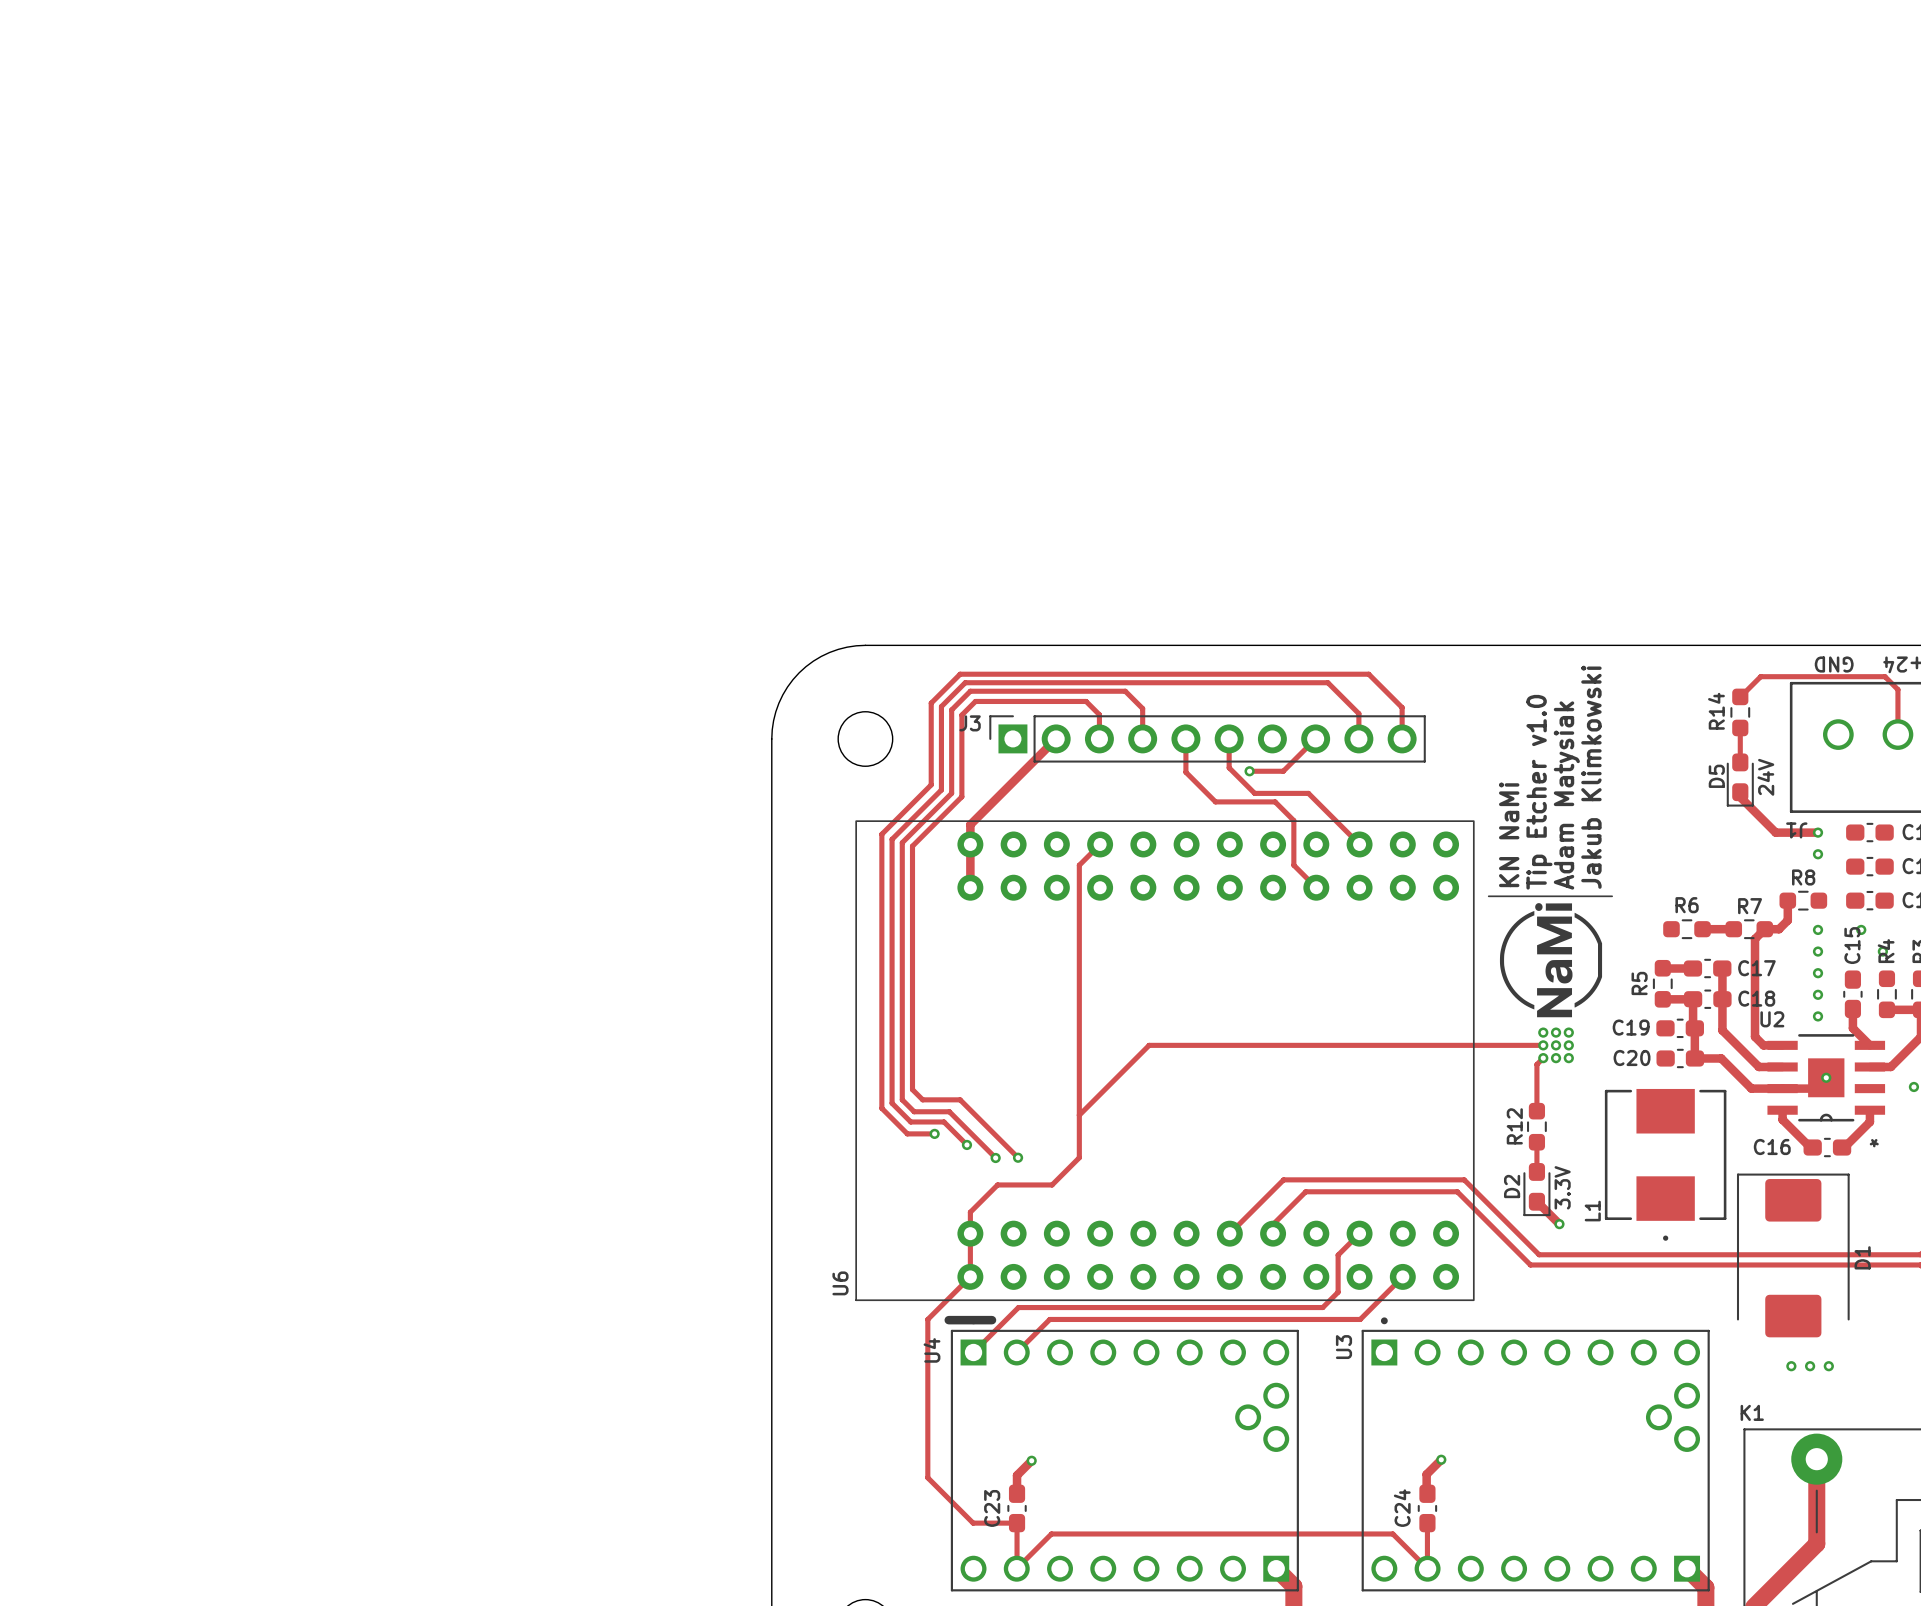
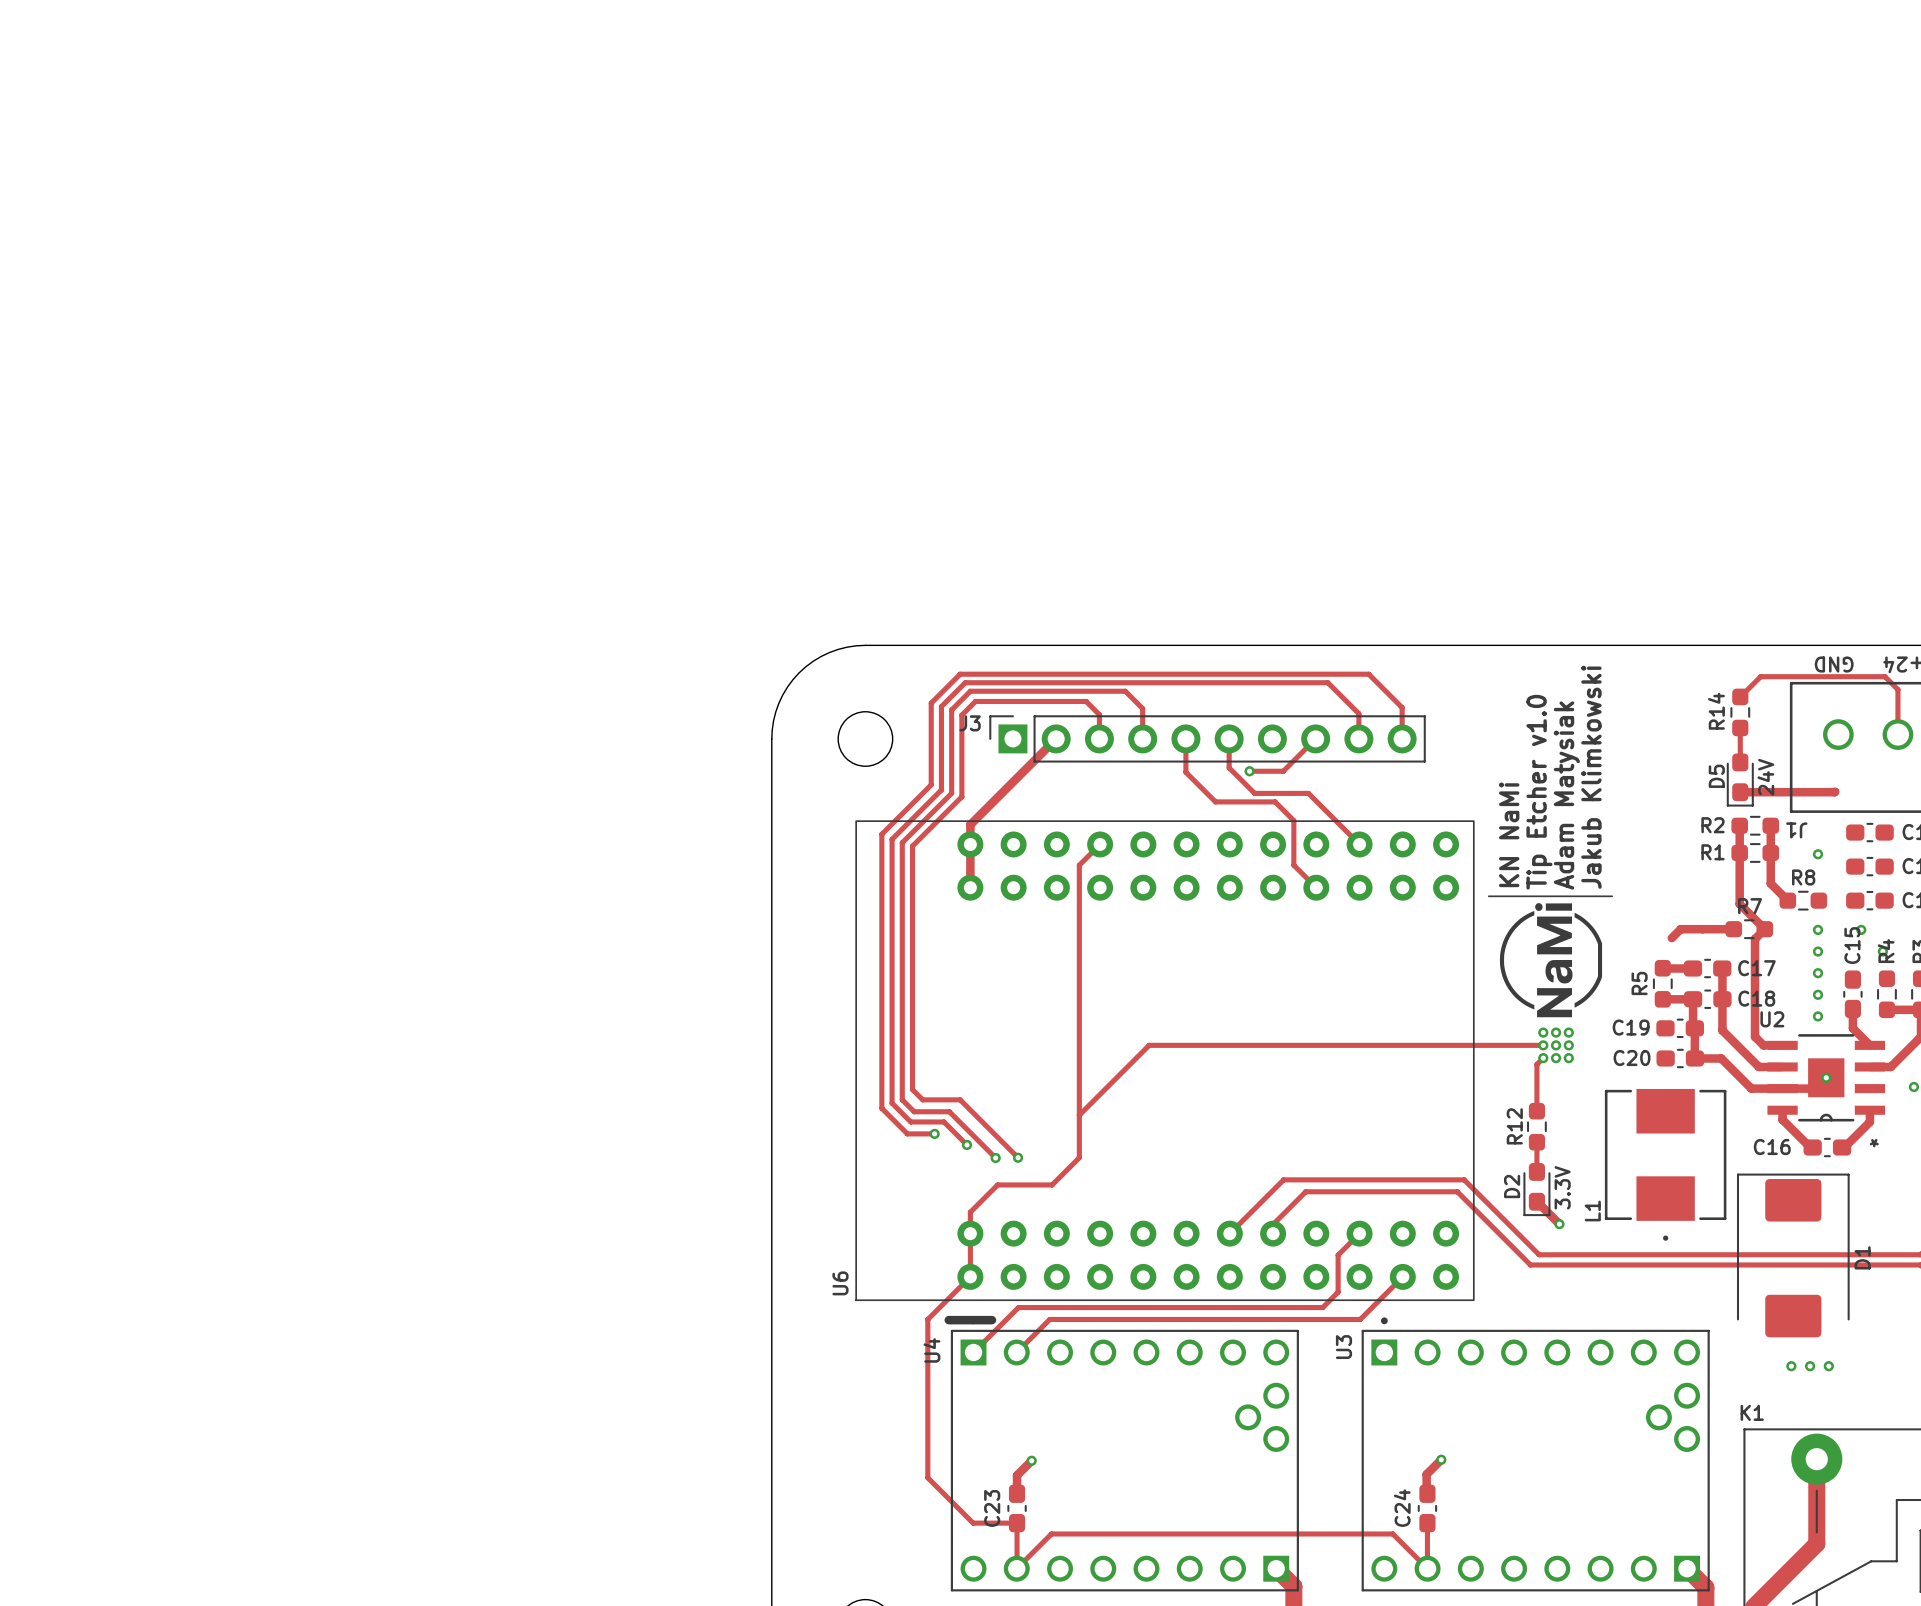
track: (1740, 792) (1740, 797) (1775, 832) (1818, 832) -> (1740, 792) (1835, 791)
R2: none -> (1755, 825)
track: none -> (1770, 825) (1770, 883) (1787, 900)
via: (1818, 832) -> none
R1: none -> (1755, 852)
track: (1787, 900) (1787, 920) (1779, 929) (1764, 929) -> (1739, 825) (1739, 904) (1764, 929)
R6: (1687, 929) -> none
track: none -> (1702, 929) (1680, 929) (1671, 938)

